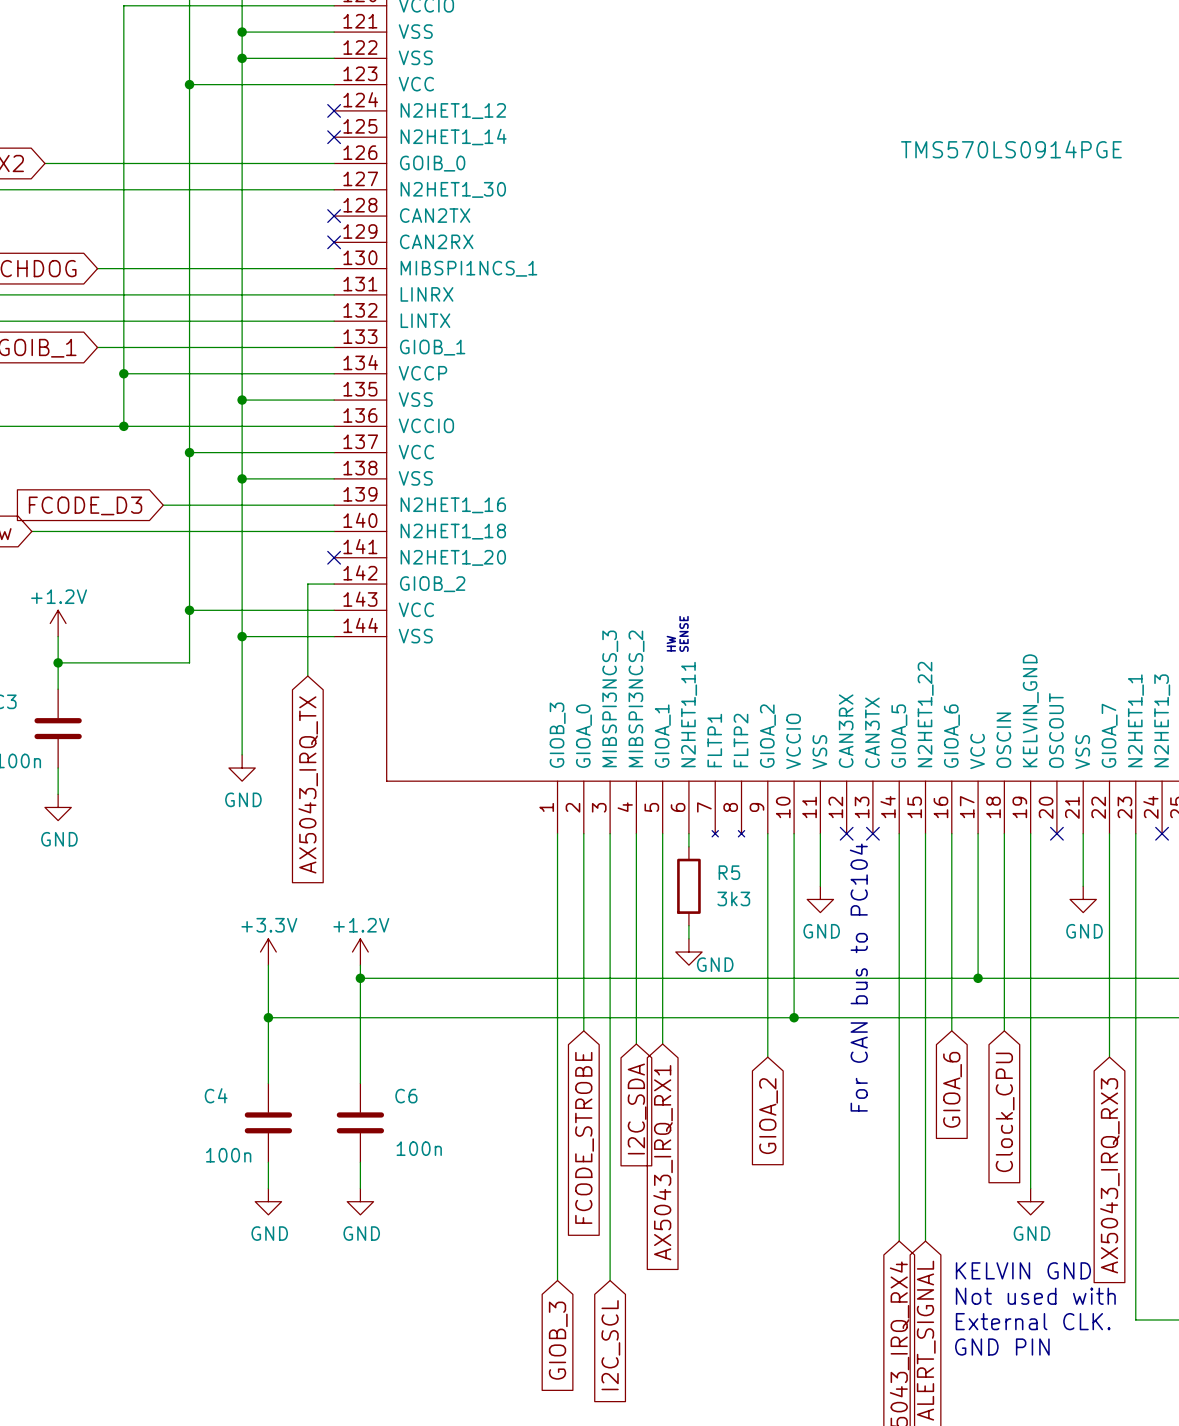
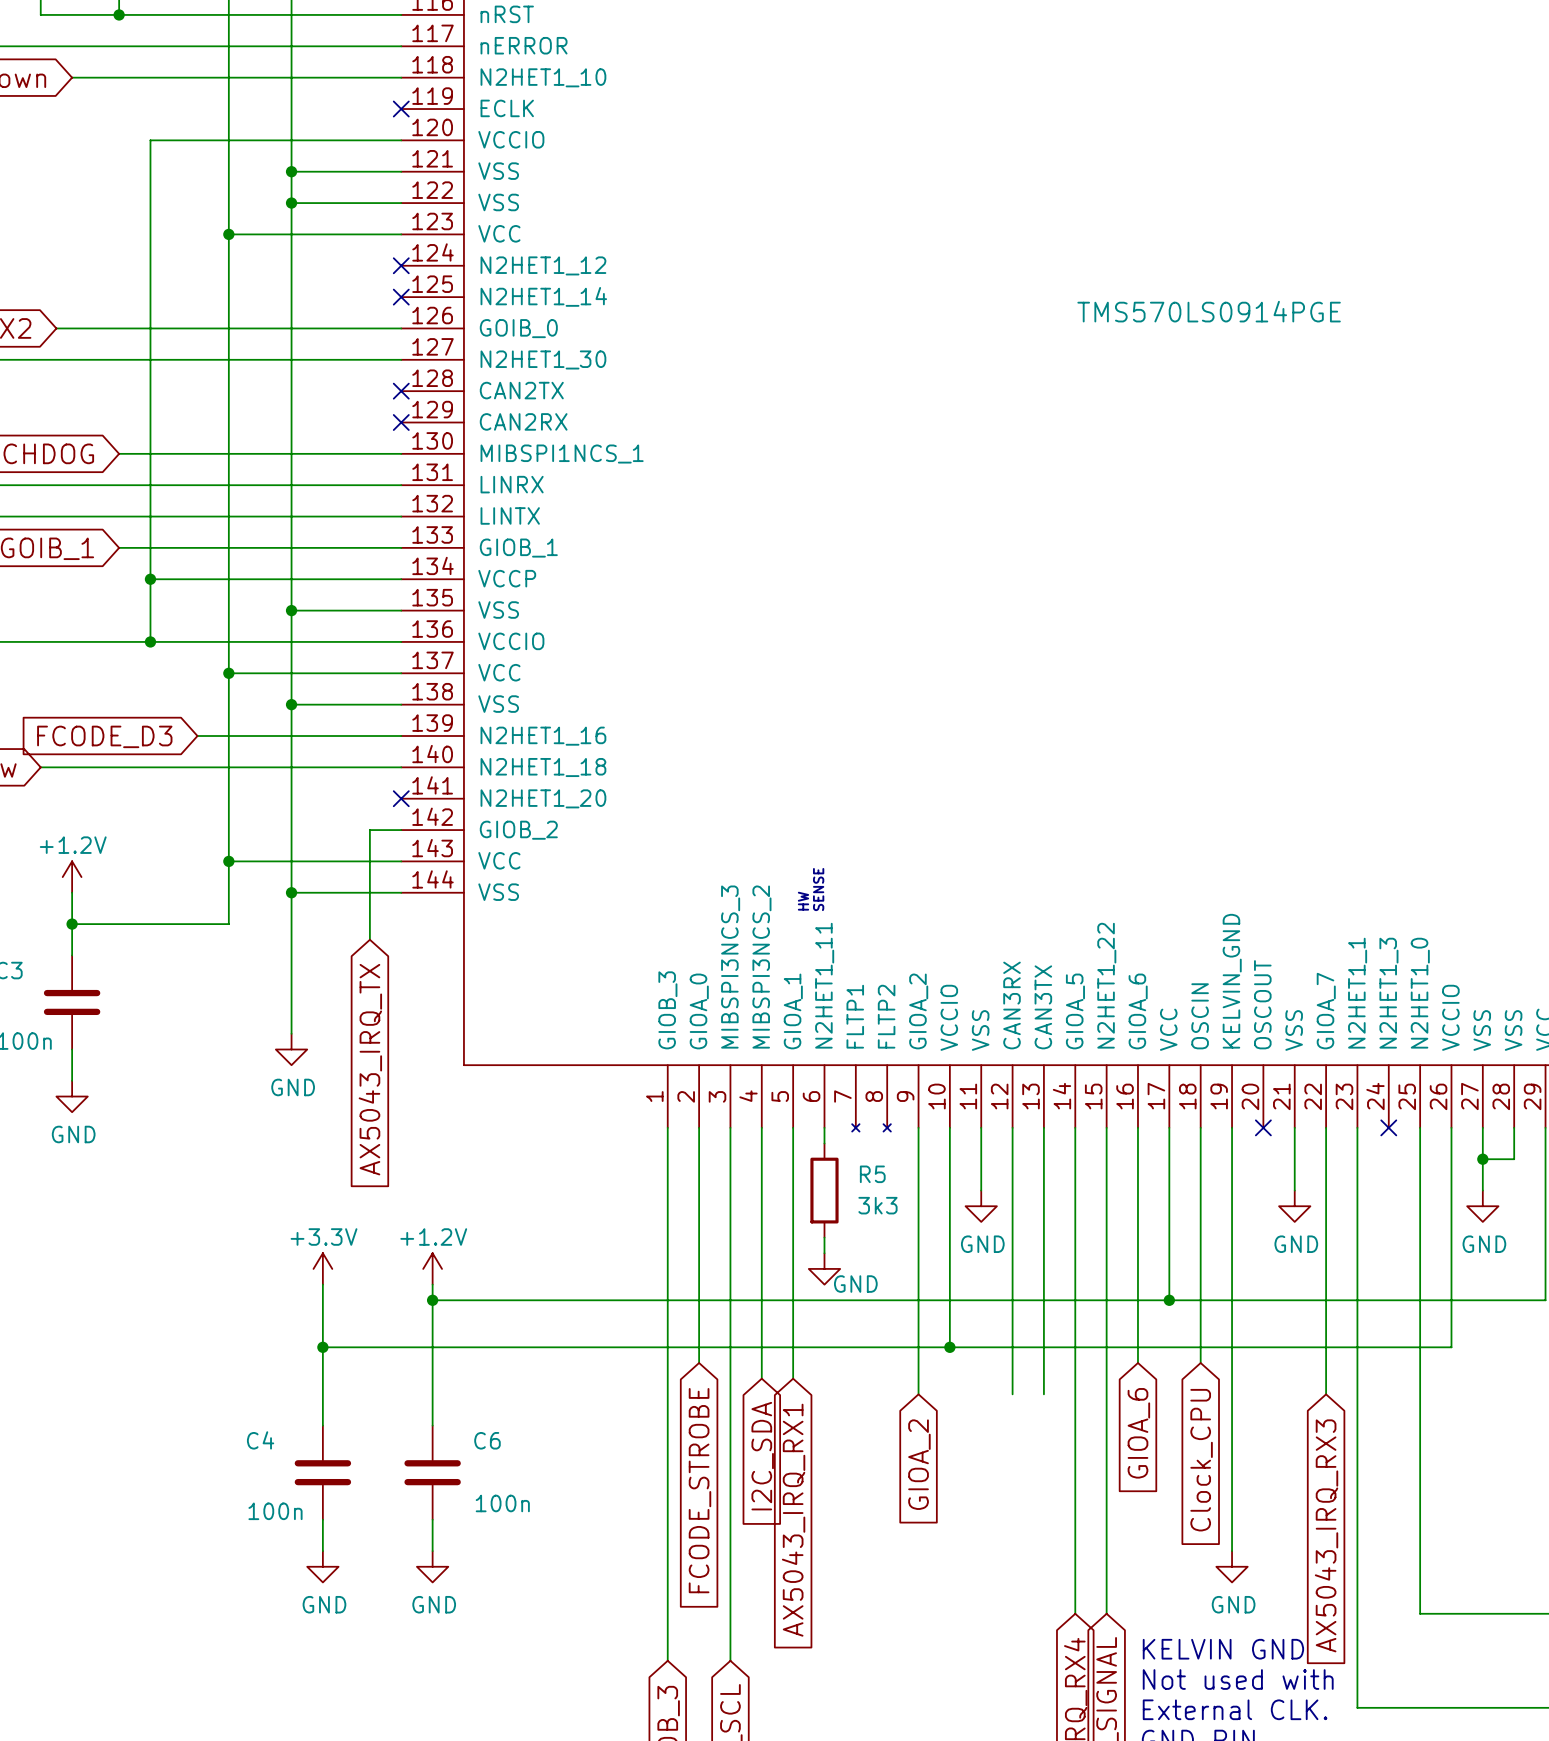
wire: none -> (1012, 1127) (1012, 1394)
no-connect mark: (846, 833) -> none
wire: none -> (1043, 1127) (1043, 1394)
no-connect mark: (872, 833) -> none
text: For CAN bus to PC104 (858, 977) -> none

